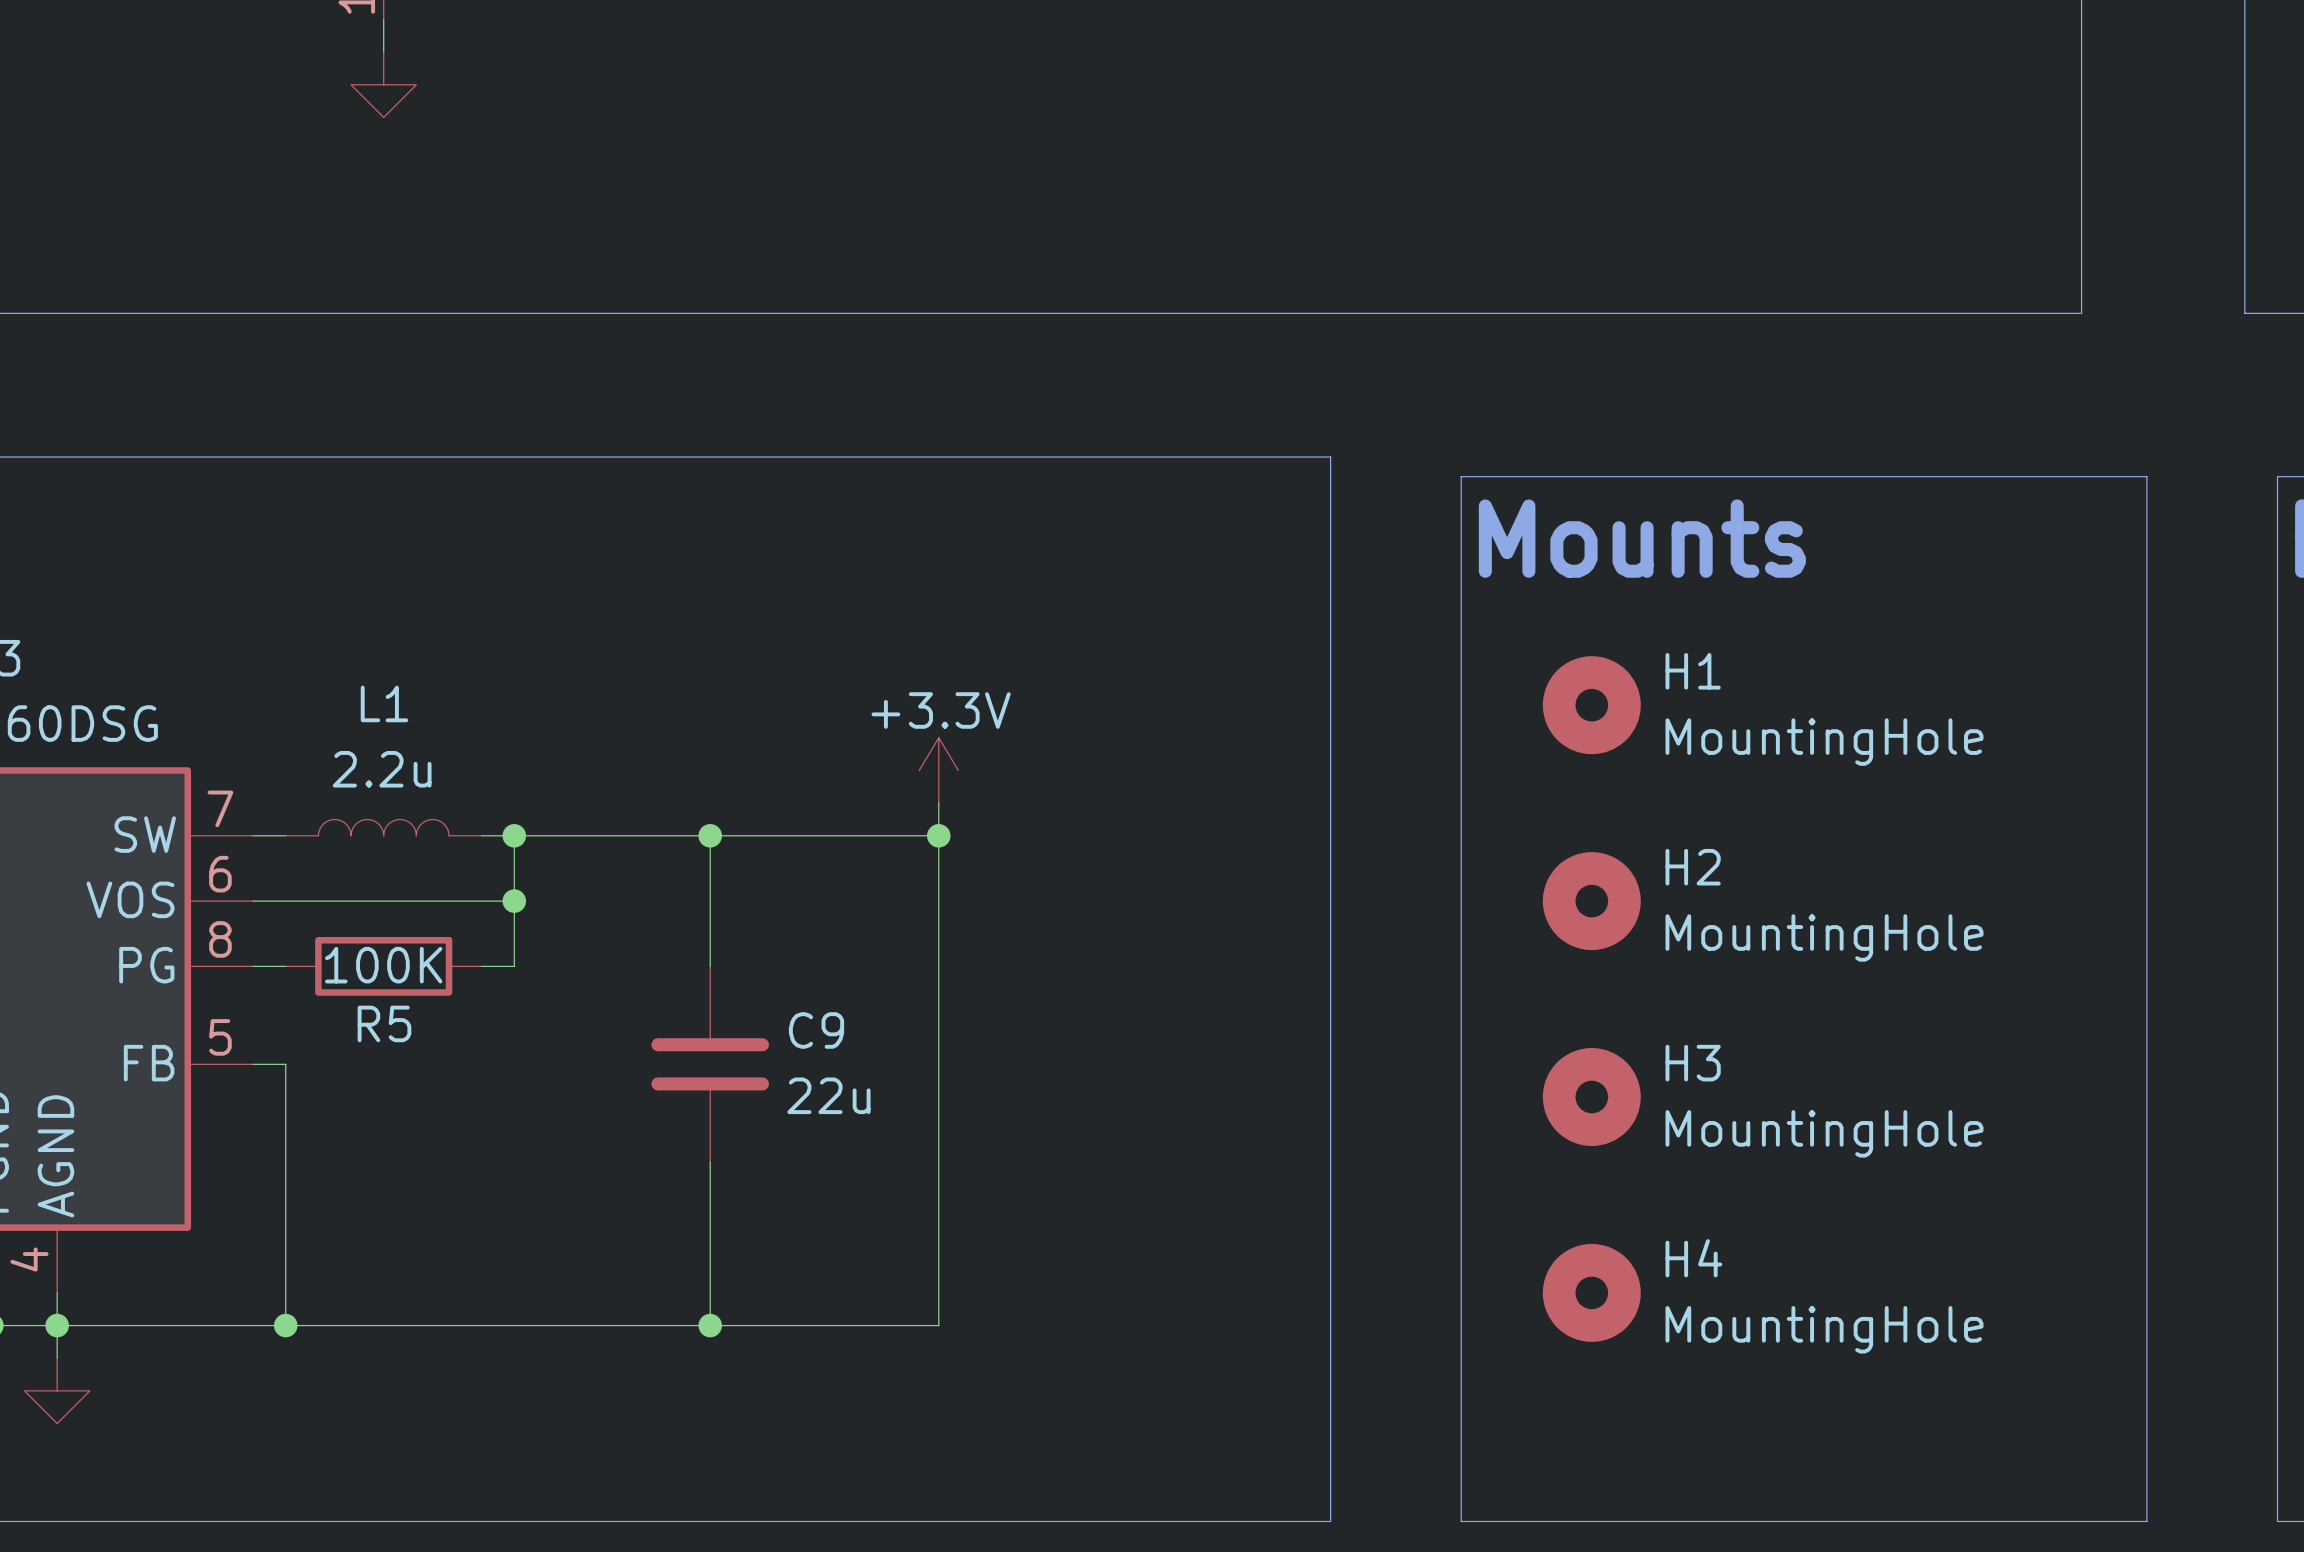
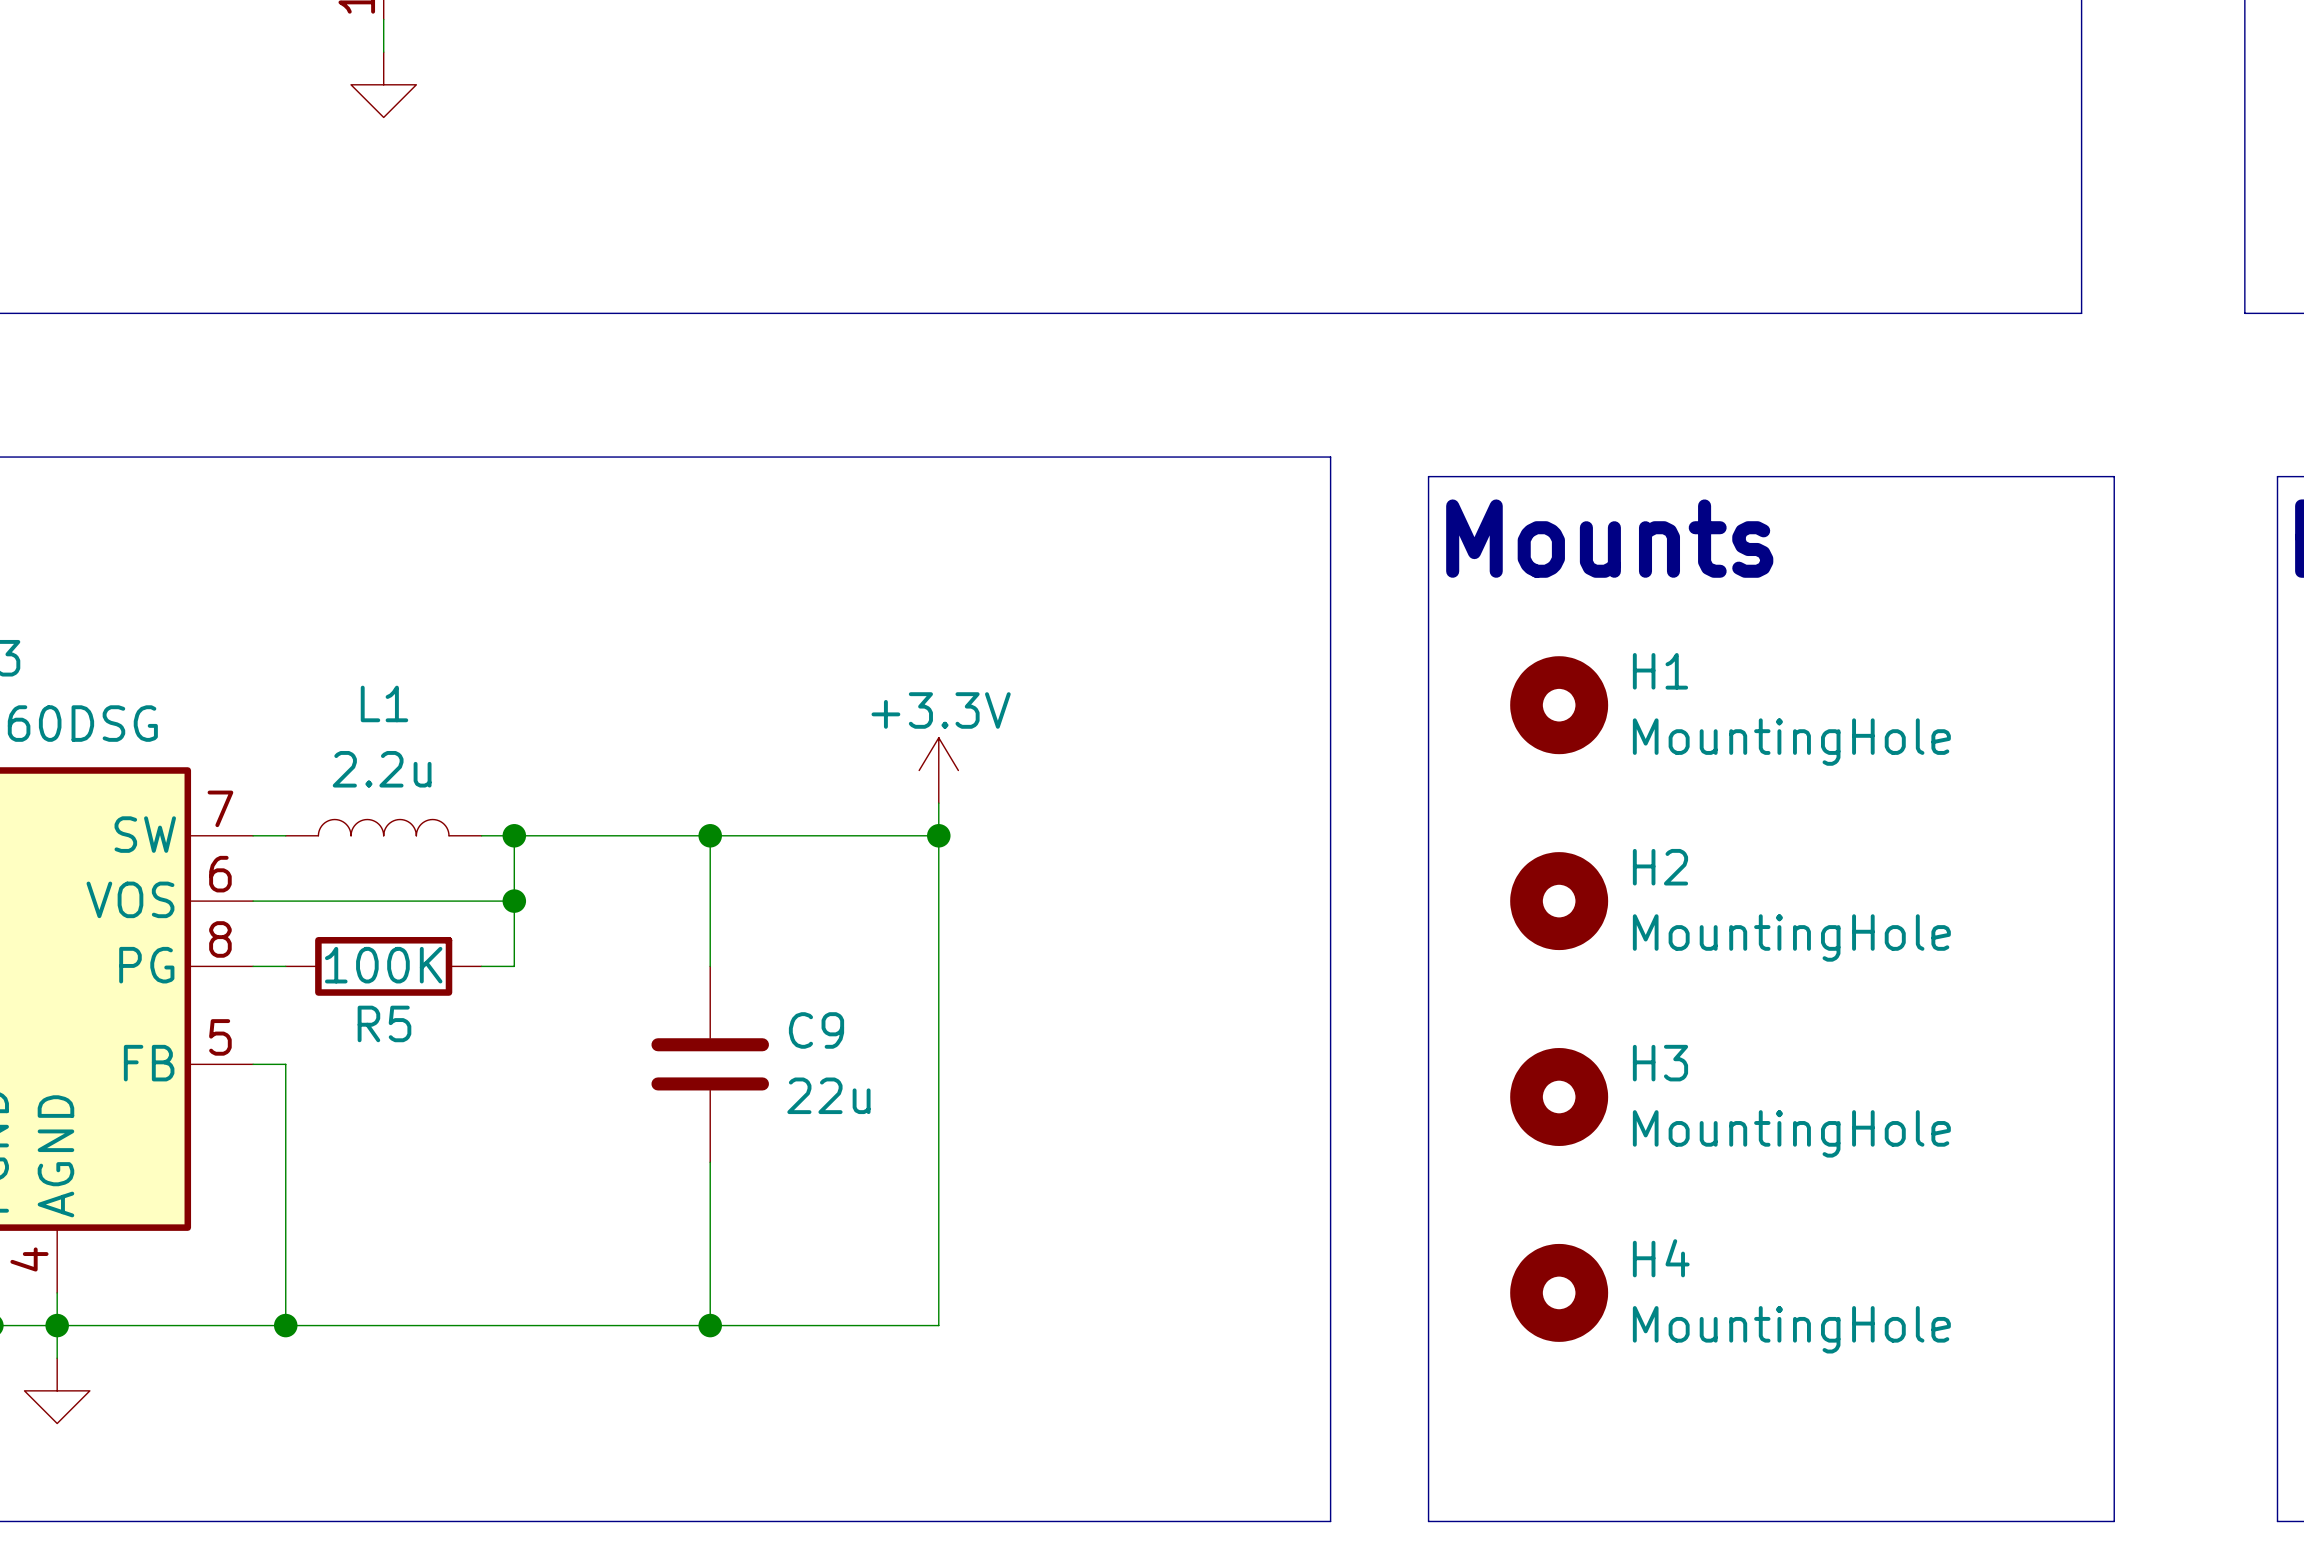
line: (1461, 476) (1461, 1521) -> (1461, 476) (1428, 476) (1428, 1521) (1461, 1521)
line: (2114, 476) (2146, 476) (2146, 1521) (2114, 1521) -> (2114, 476) (2114, 1521)
text position: Mounts (1642, 538) -> Mounts (1609, 538)
H1 position: (1591, 705) -> (1559, 705)
H2 position: (1591, 901) -> (1559, 901)
H3 position: (1591, 1097) -> (1559, 1097)
H4 position: (1591, 1292) -> (1559, 1292)

